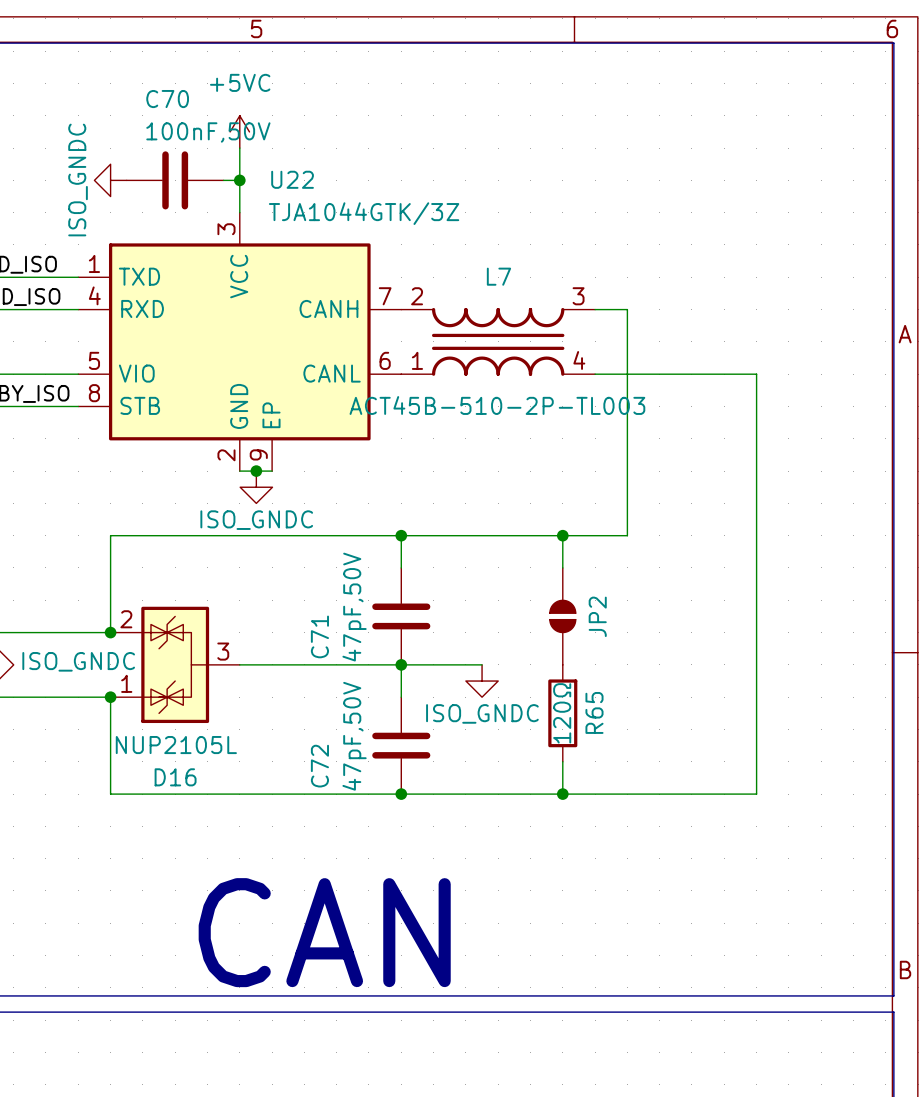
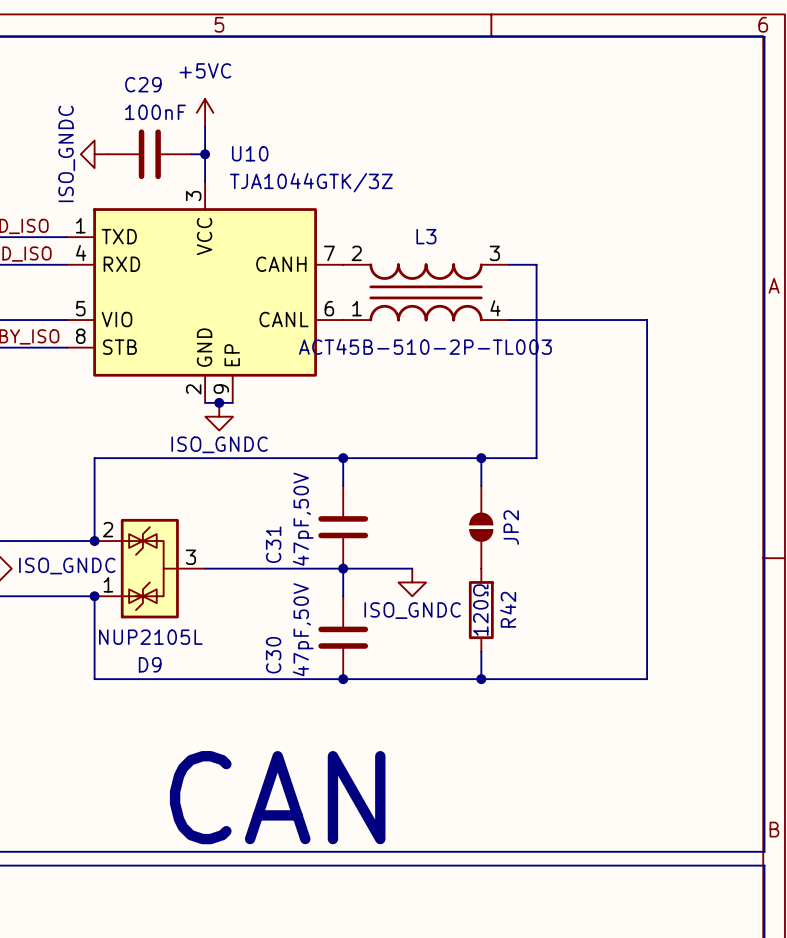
C70 name: C70 (167, 99) -> C29 (143, 84)
C70 value: 100nF,50V (208, 132) -> 100nF (155, 112)
U22 name: U22 (292, 179) -> U10 (250, 153)
L7 name: L7 (498, 276) -> L3 (426, 236)
C71 name: C71 (319, 636) -> C31 (273, 544)
R65 name: R65 (594, 712) -> R42 (508, 609)
C72 name: C72 (319, 766) -> C30 (273, 655)
D16 name: D16 (175, 777) -> D9 (150, 664)

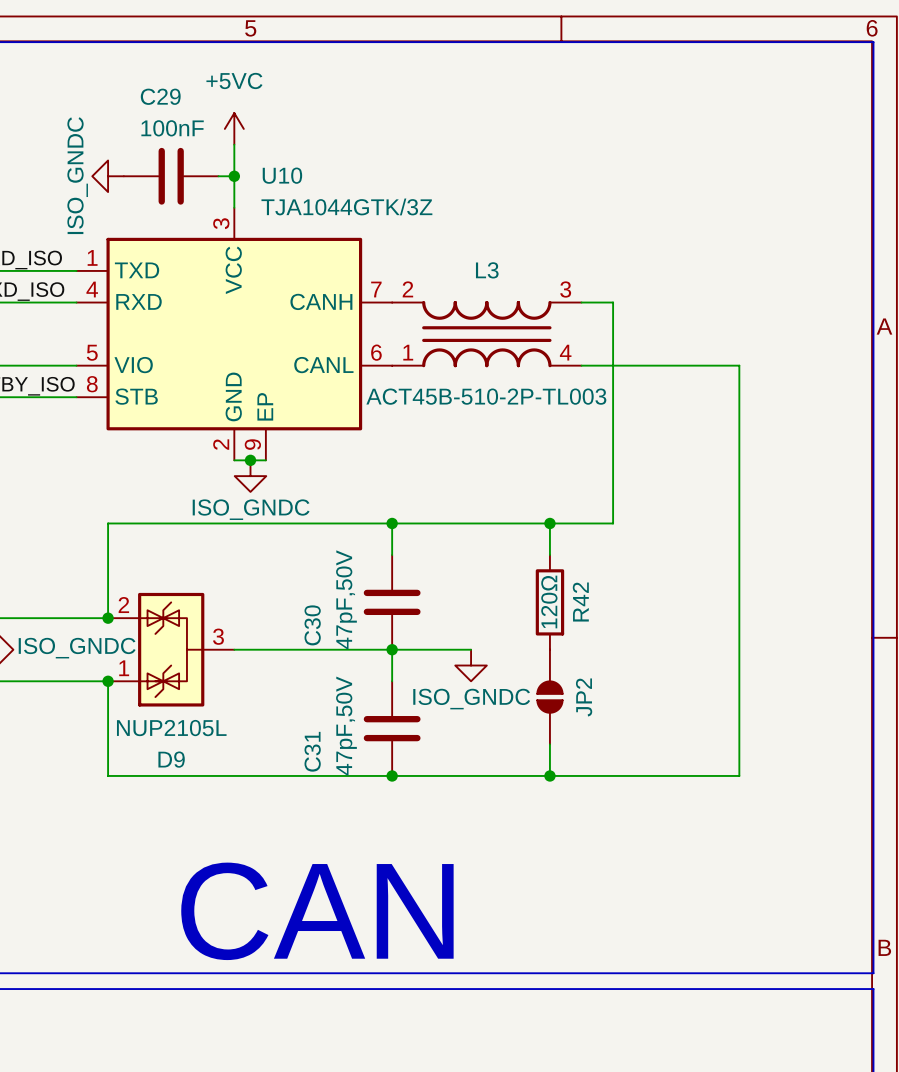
JP2 position: (481, 527) -> (549, 697)
C31 name: C31 (273, 544) -> C30 (312, 625)
R42 position: (481, 610) -> (549, 602)
C30 name: C30 (273, 655) -> C31 (312, 751)

